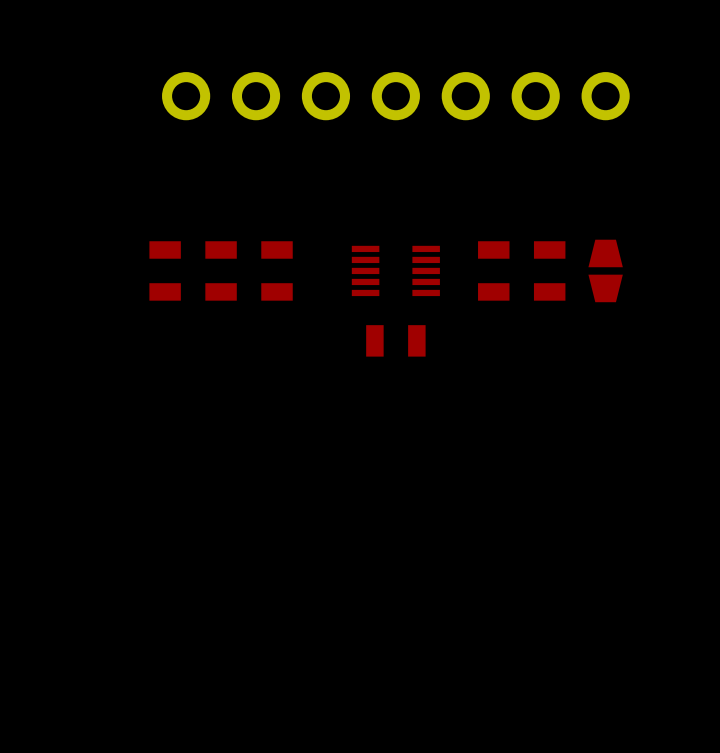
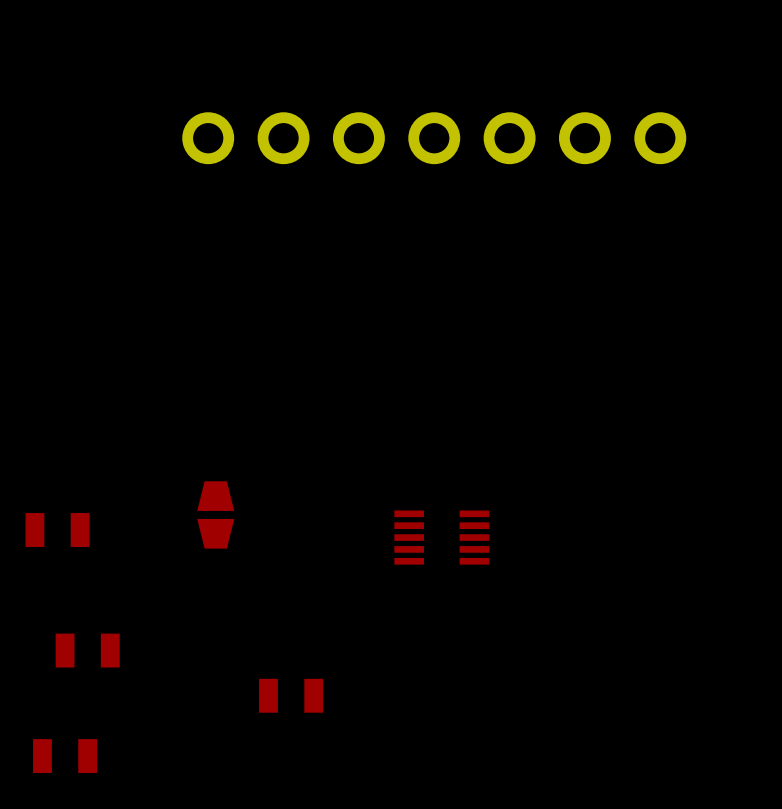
part: (165, 270) -> none
part: (221, 270) -> none
part: (277, 270) -> none
part position: (395, 270) -> (441, 537)
part: (493, 270) -> none
part: (549, 270) -> none
part position: (605, 270) -> (215, 514)
part: (395, 340) -> none
part: none -> (57, 530)
part: none -> (87, 650)
part: none -> (291, 695)
part: none -> (65, 756)

